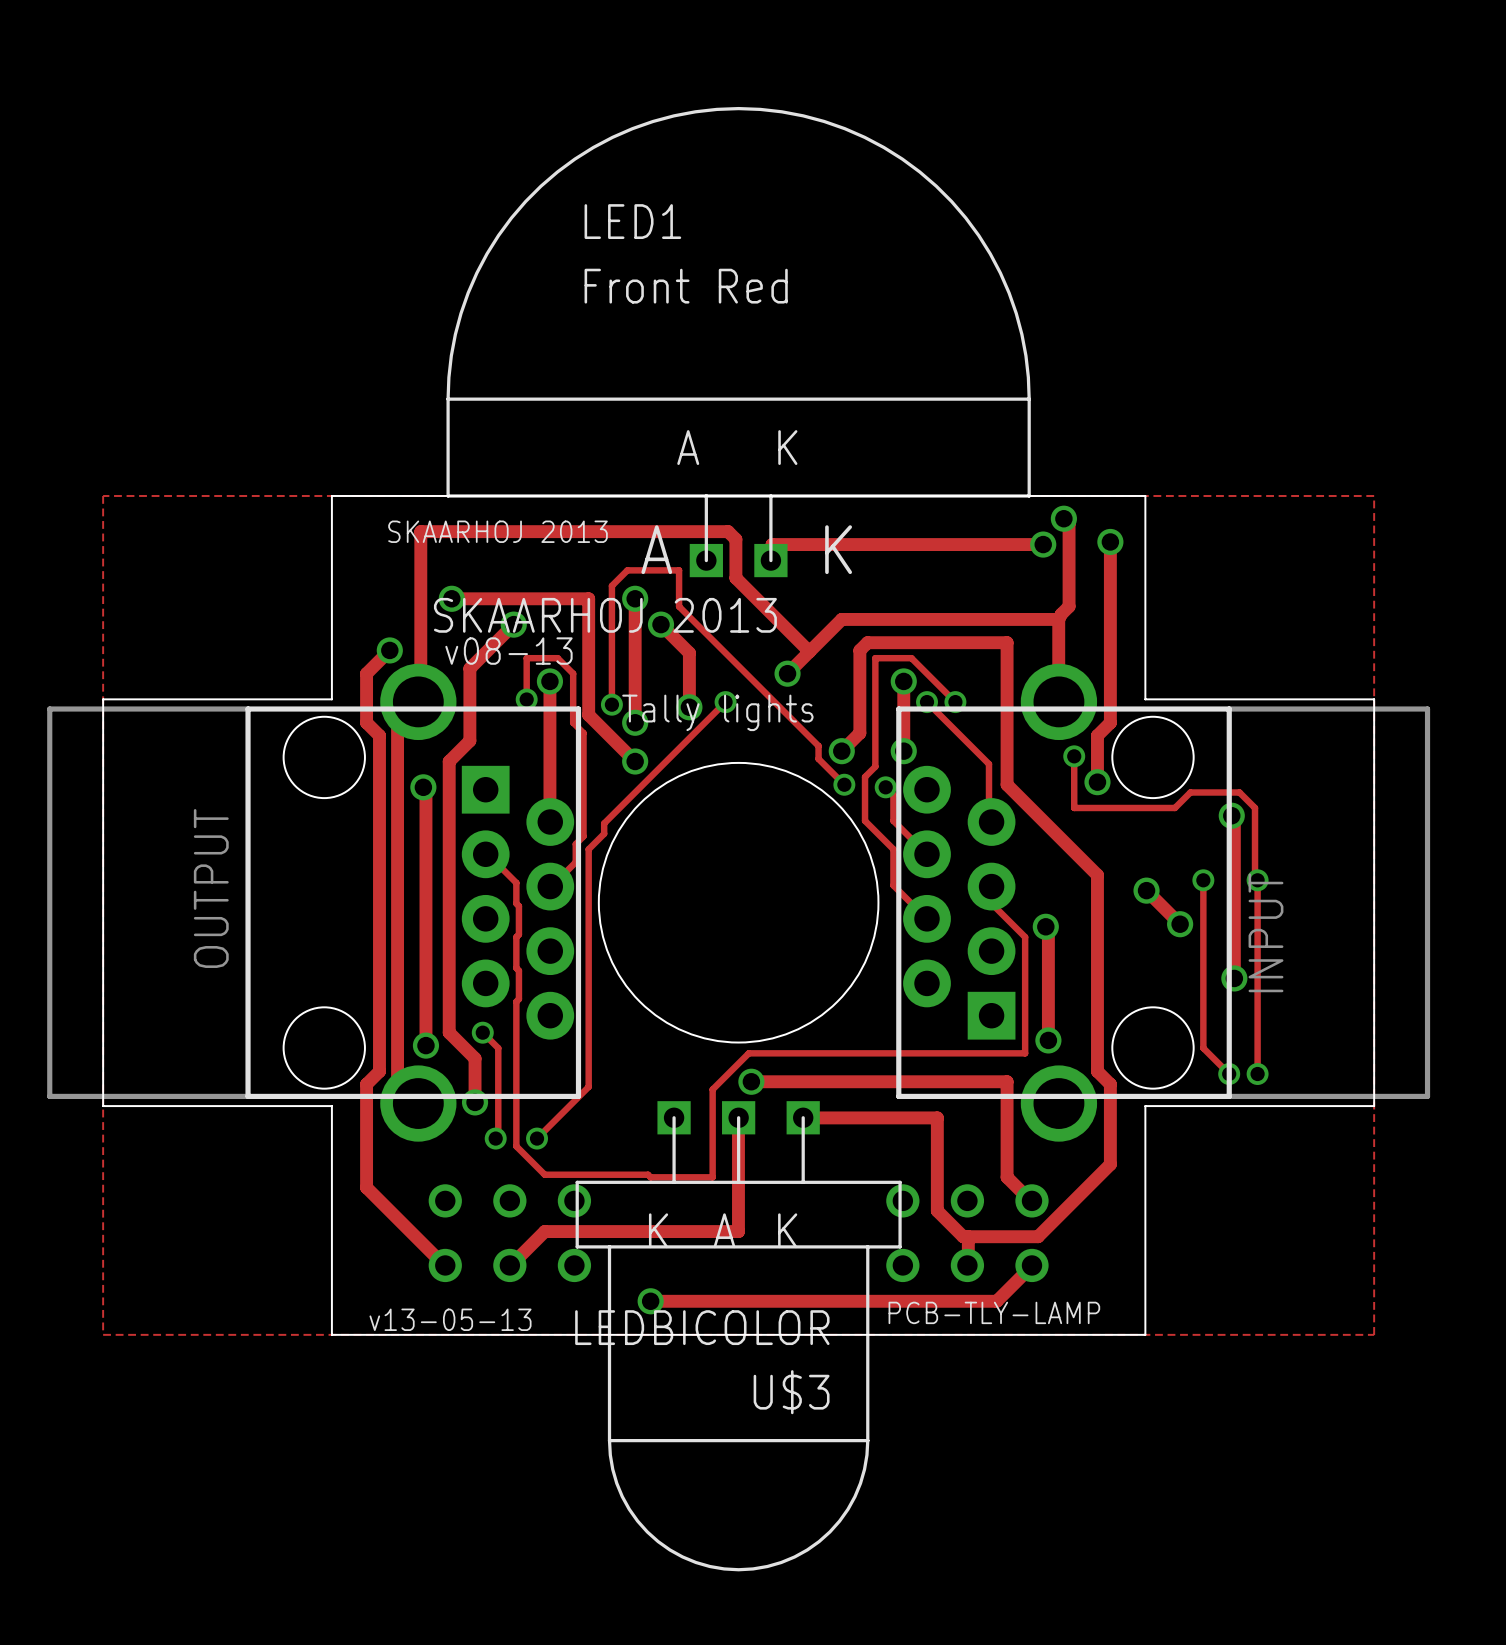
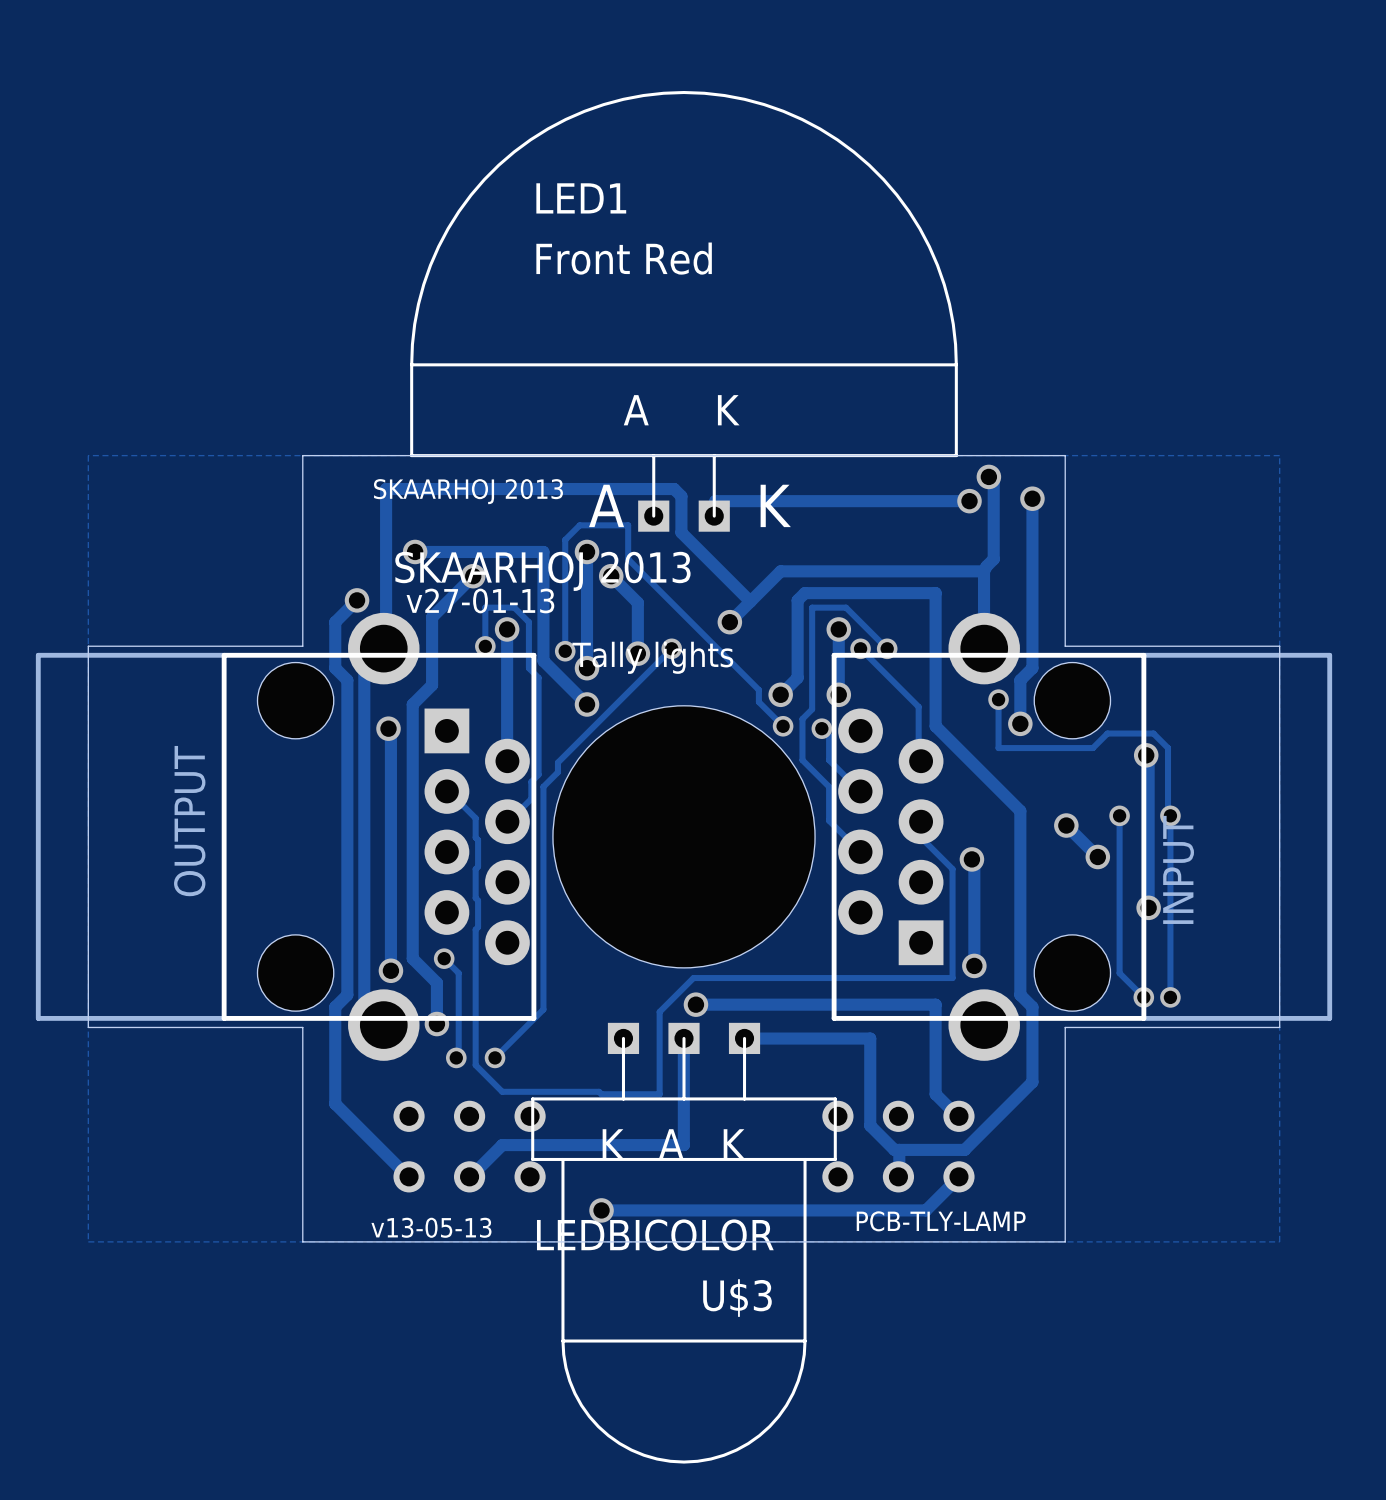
text: v08-13 (508, 651) -> v27-01-13 (480, 600)

